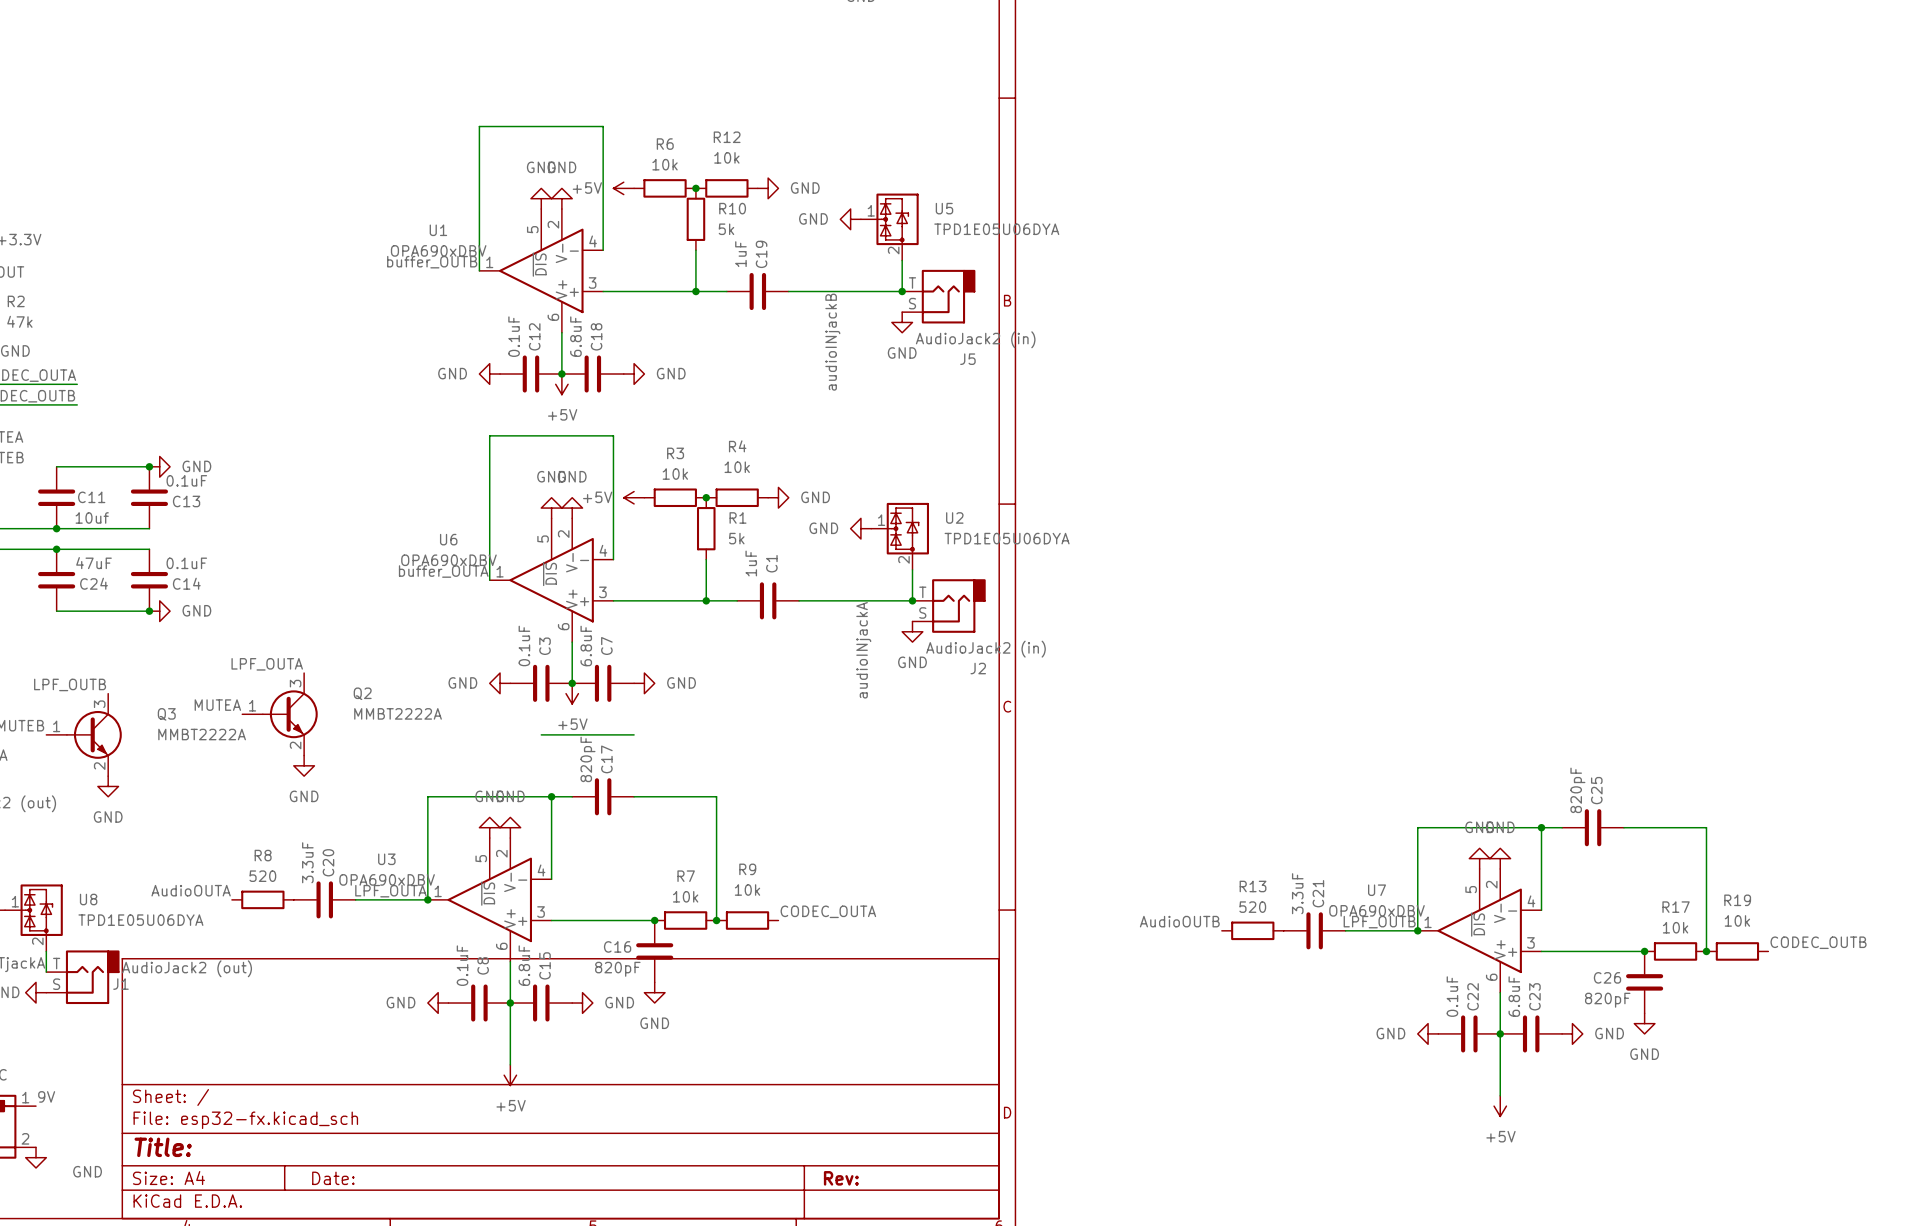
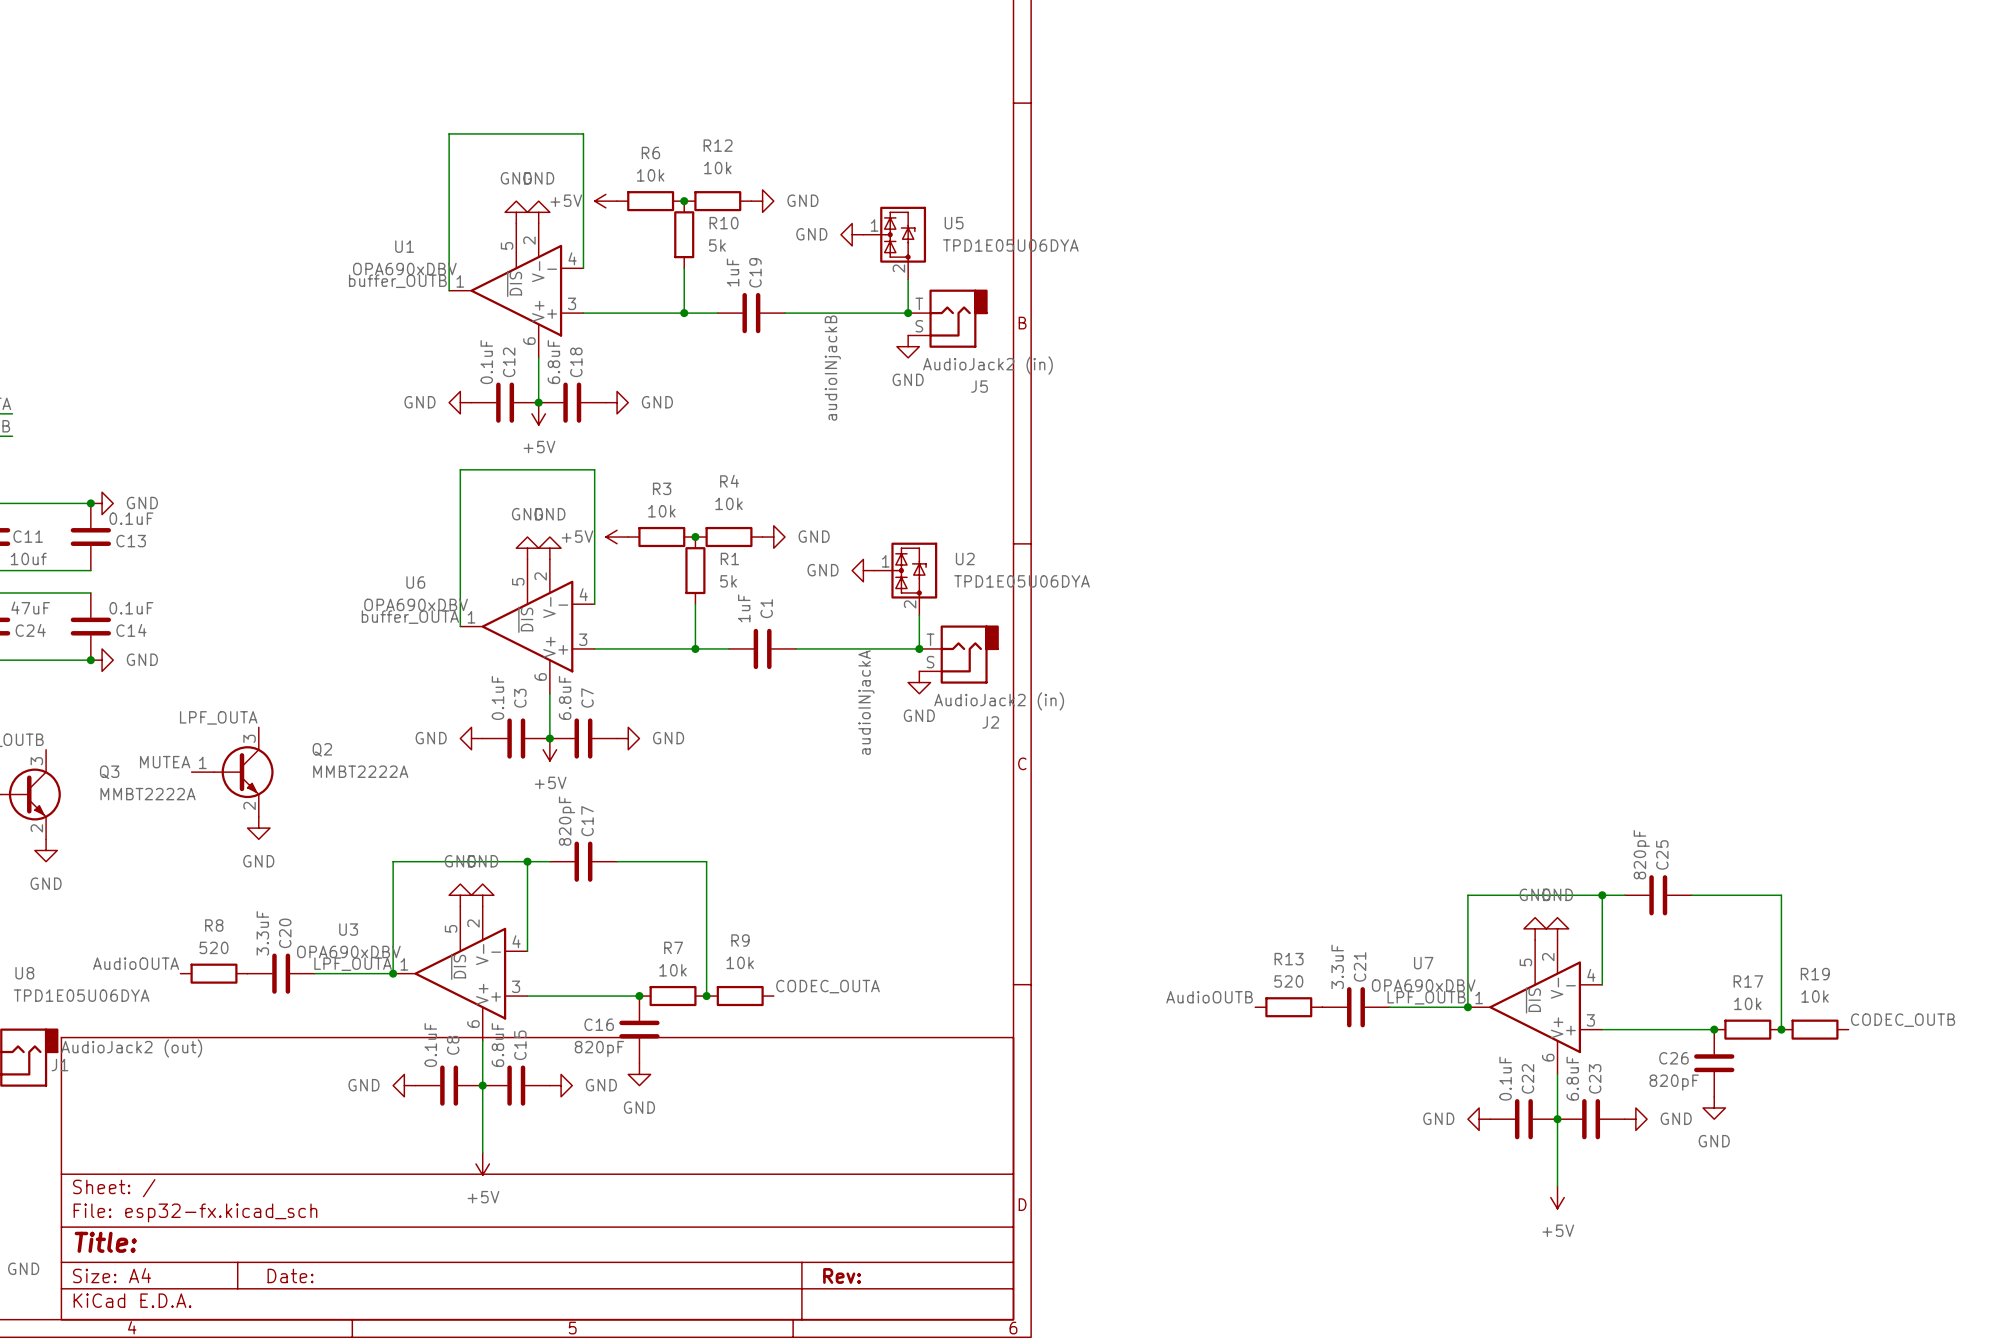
wire: (541, 734) (634, 734) -> none

